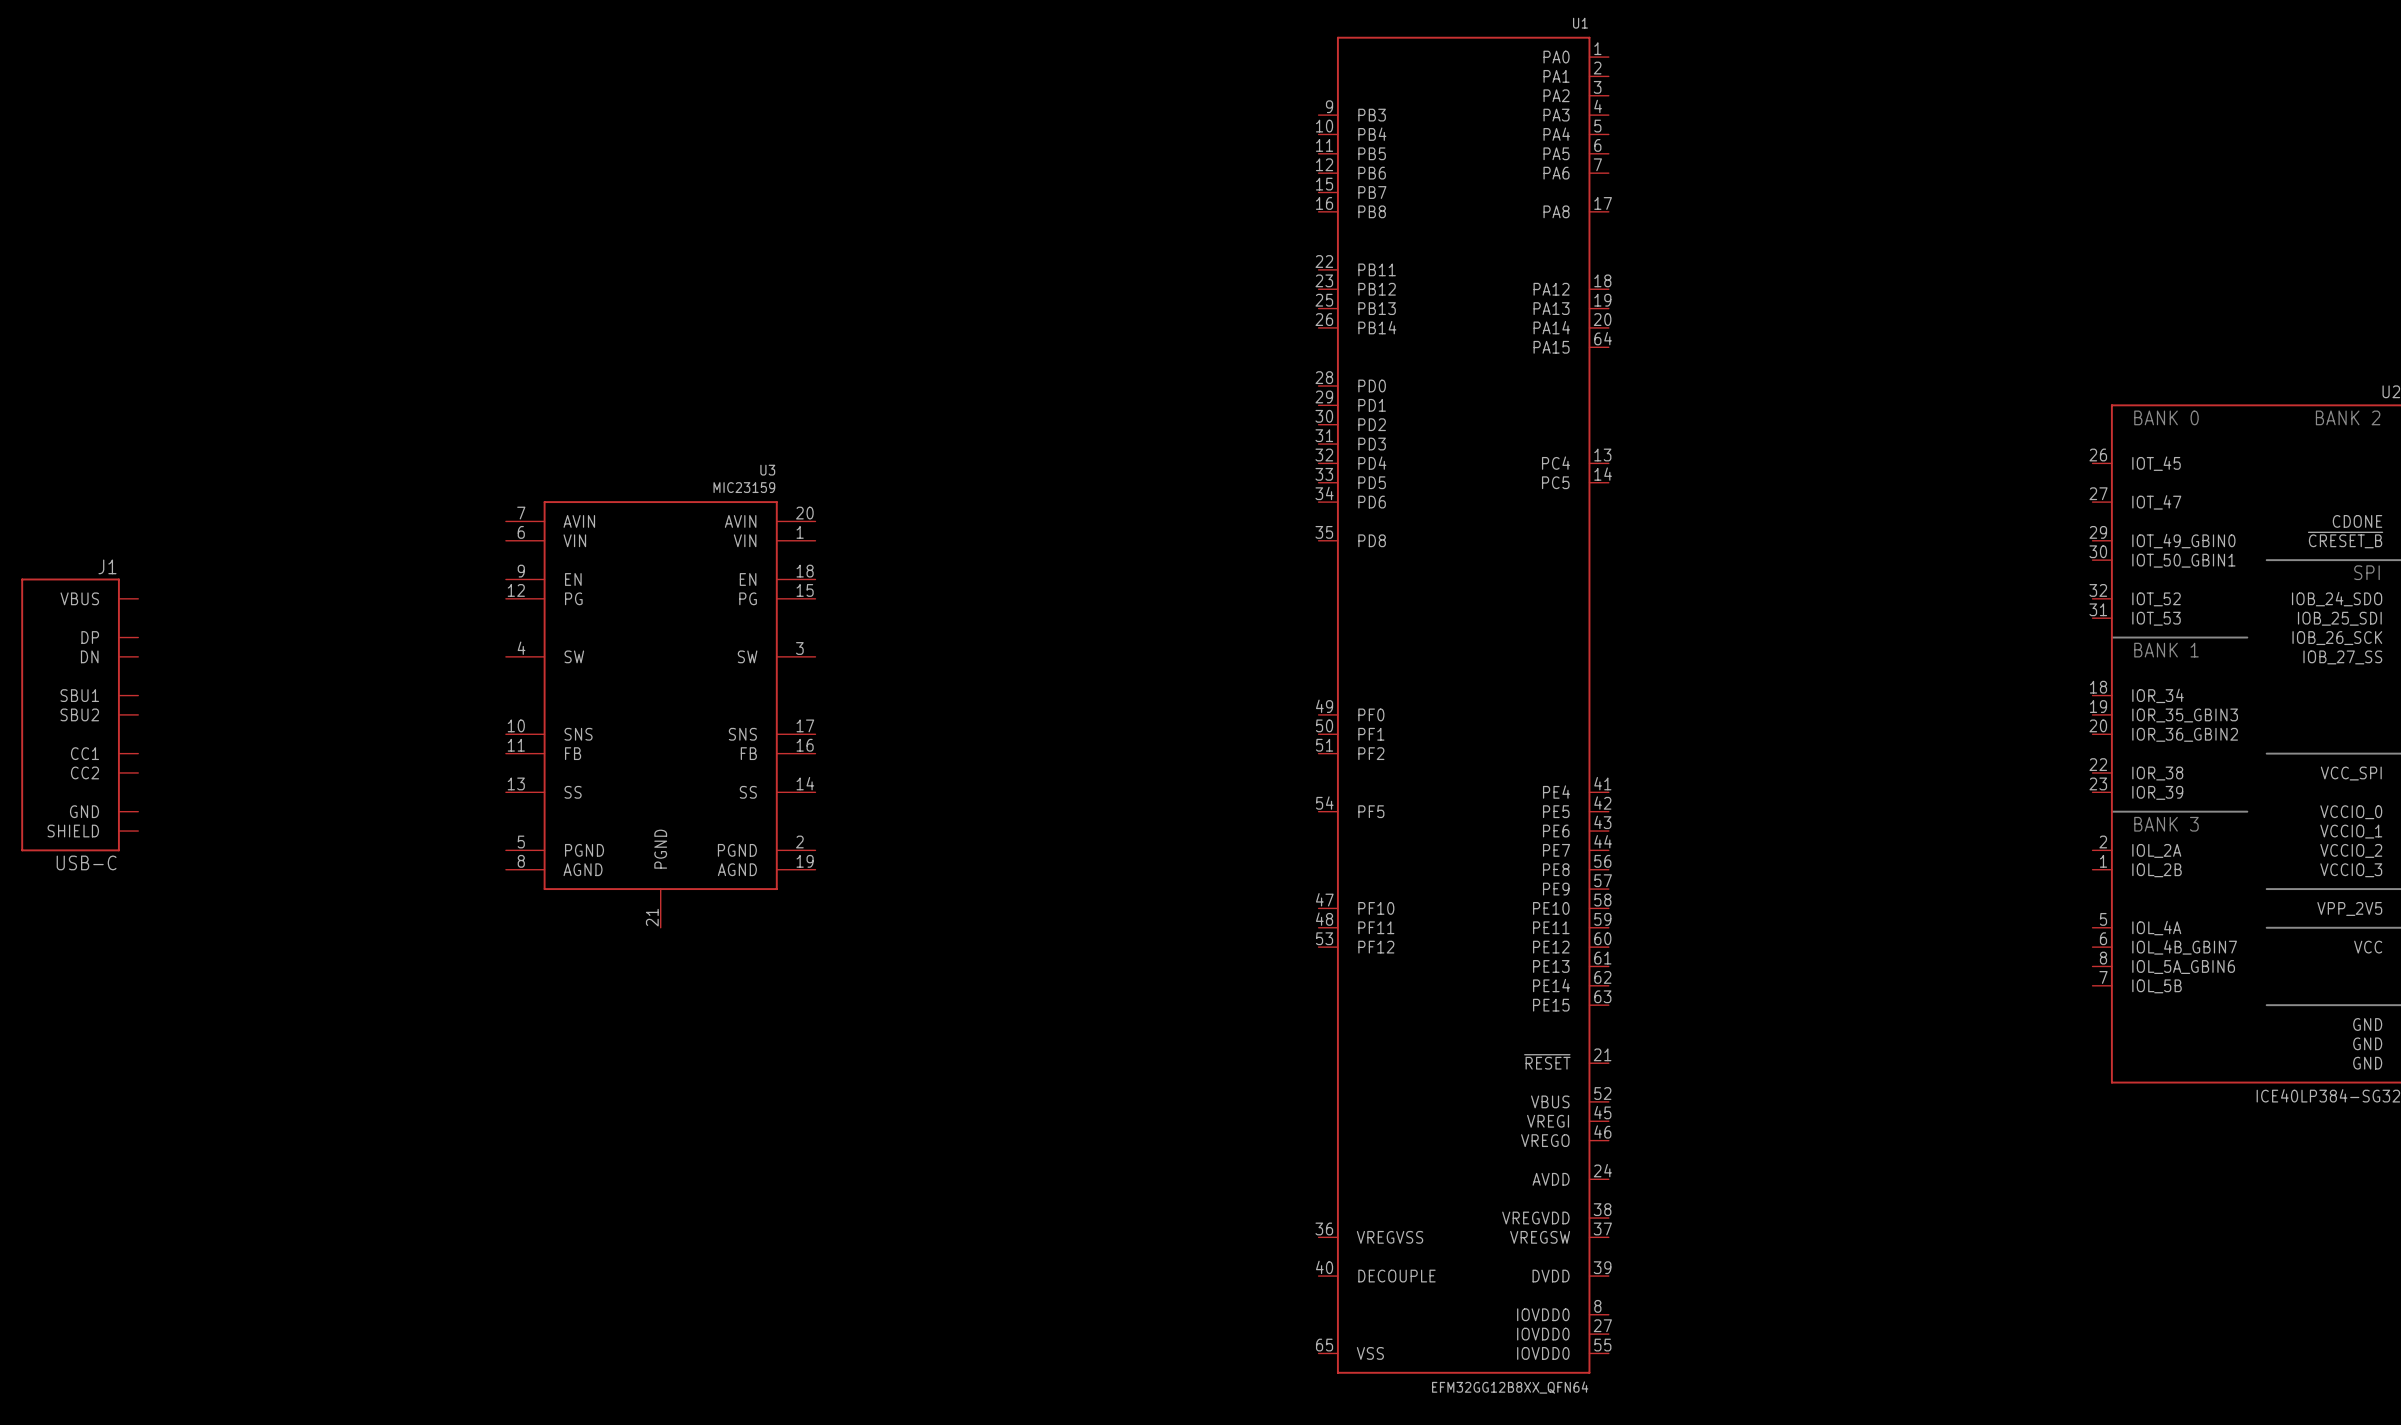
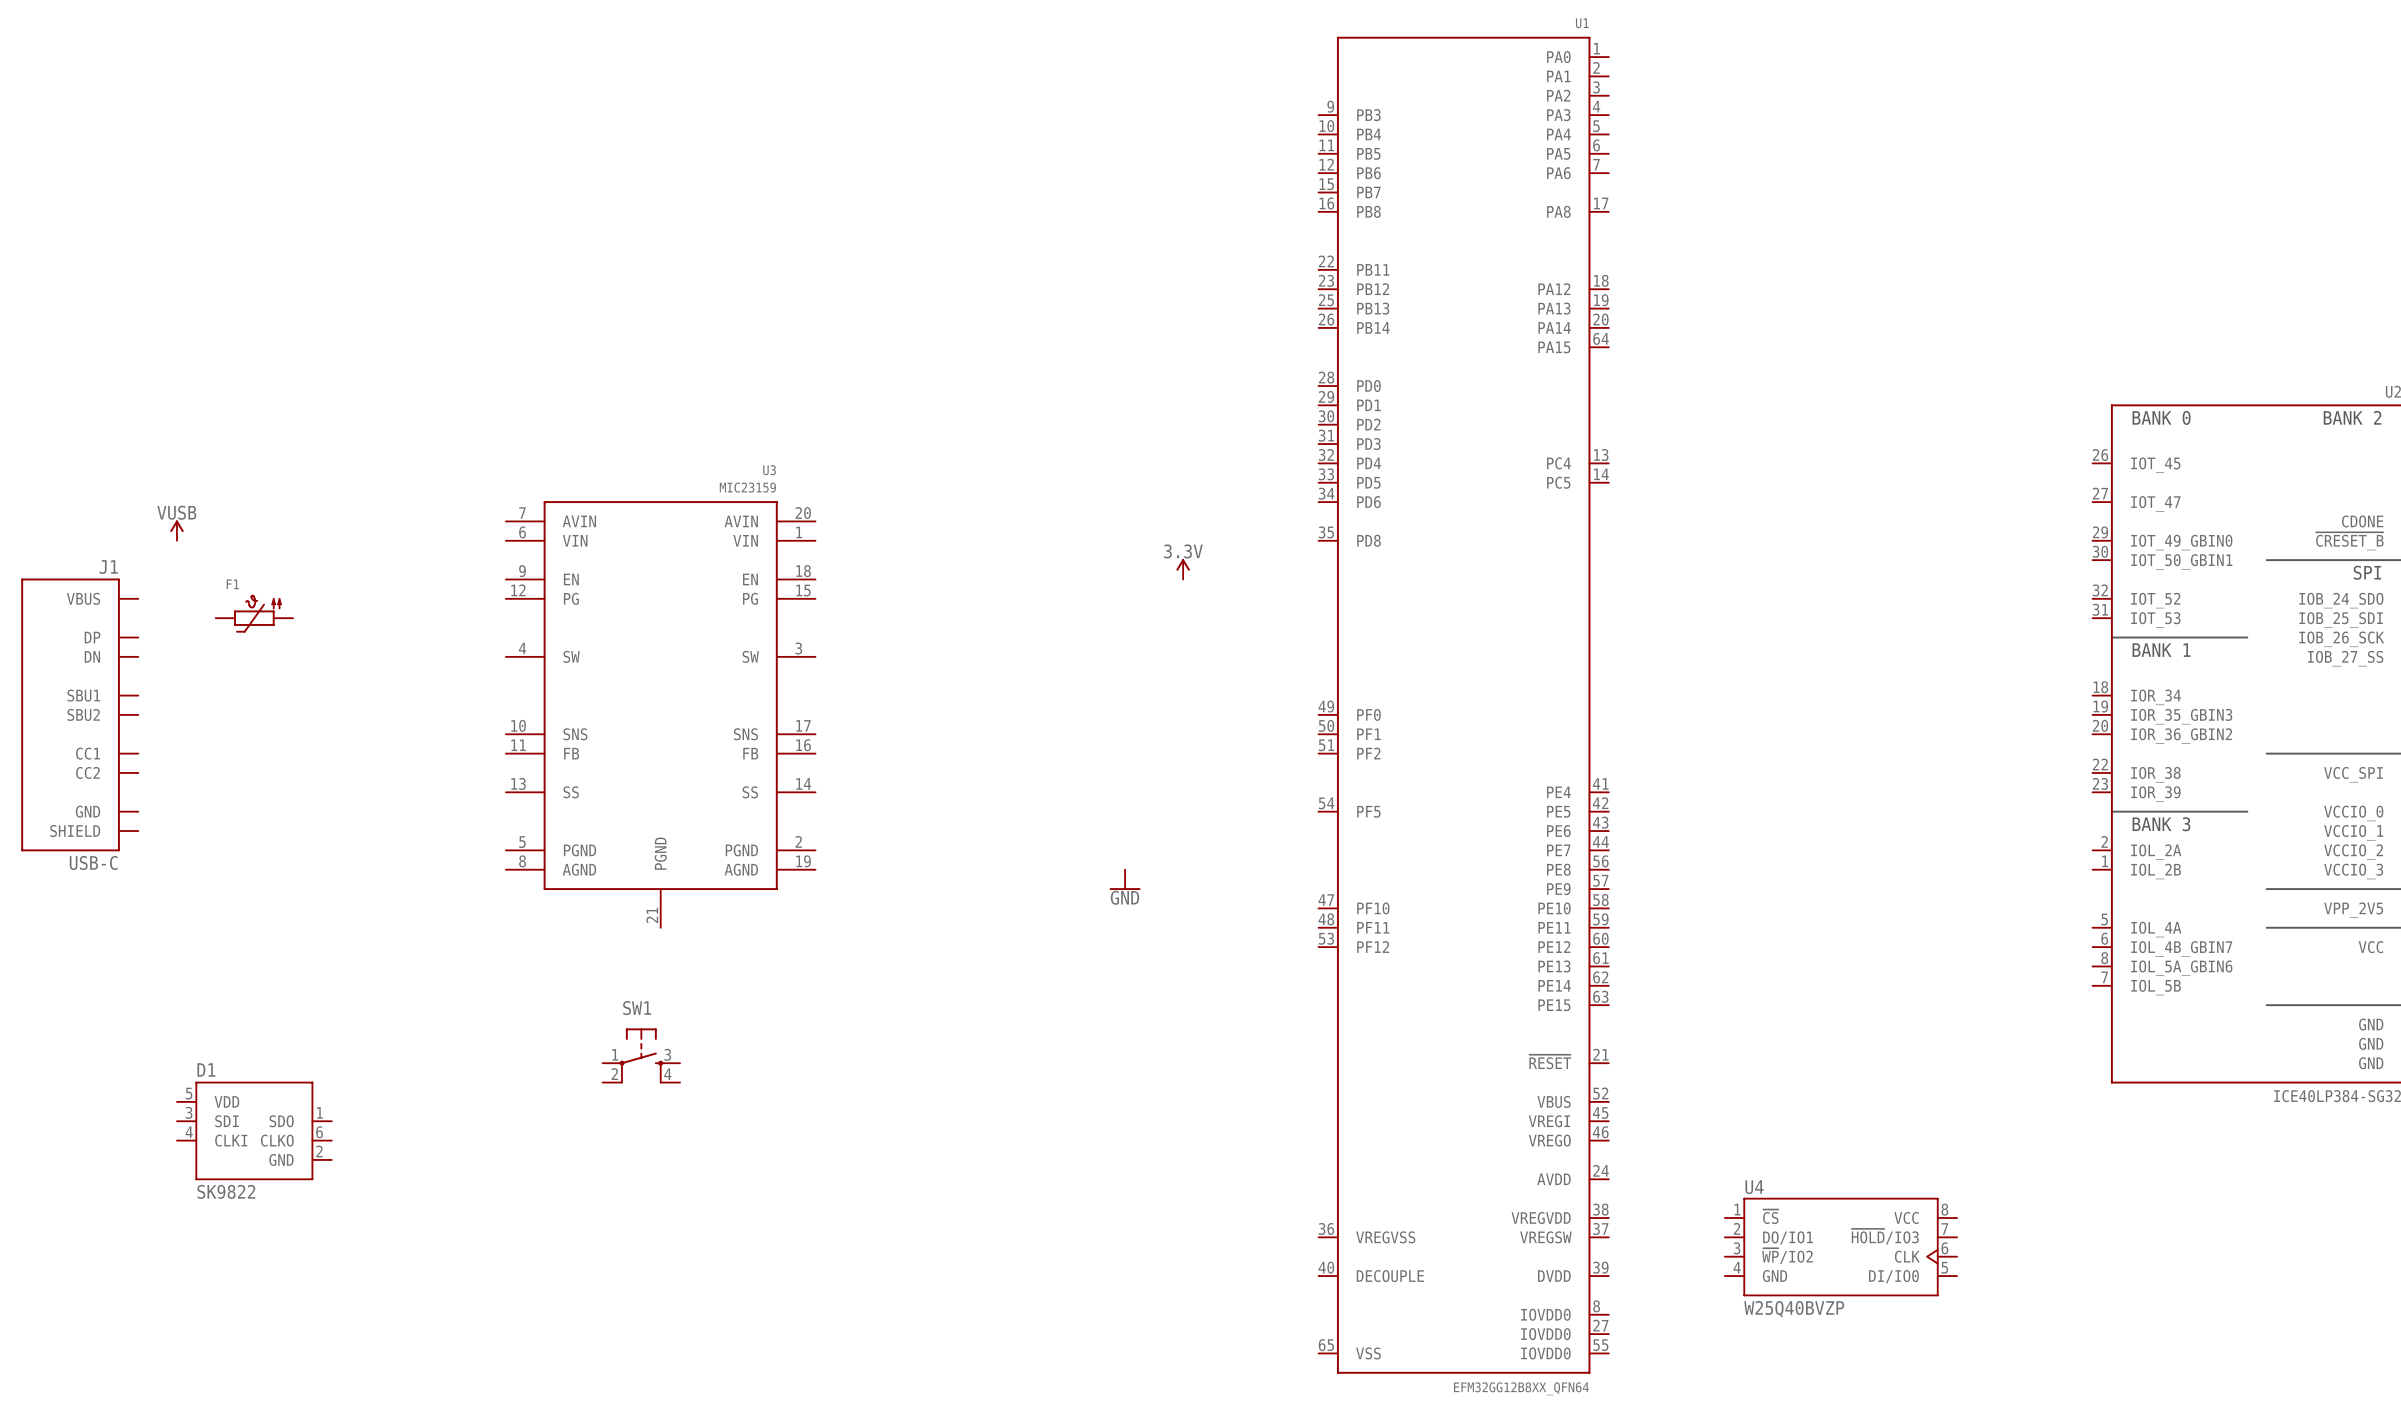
power symbol: none -> VUSB (176, 530)
power symbol: none -> 3.3V (1183, 569)
F1: none -> (254, 613)
power symbol: none -> GND (1125, 879)
SW1: none -> (641, 1055)
D1: none -> SK9822 (254, 1130)
U4: none -> W25Q40BVZP (1841, 1247)

